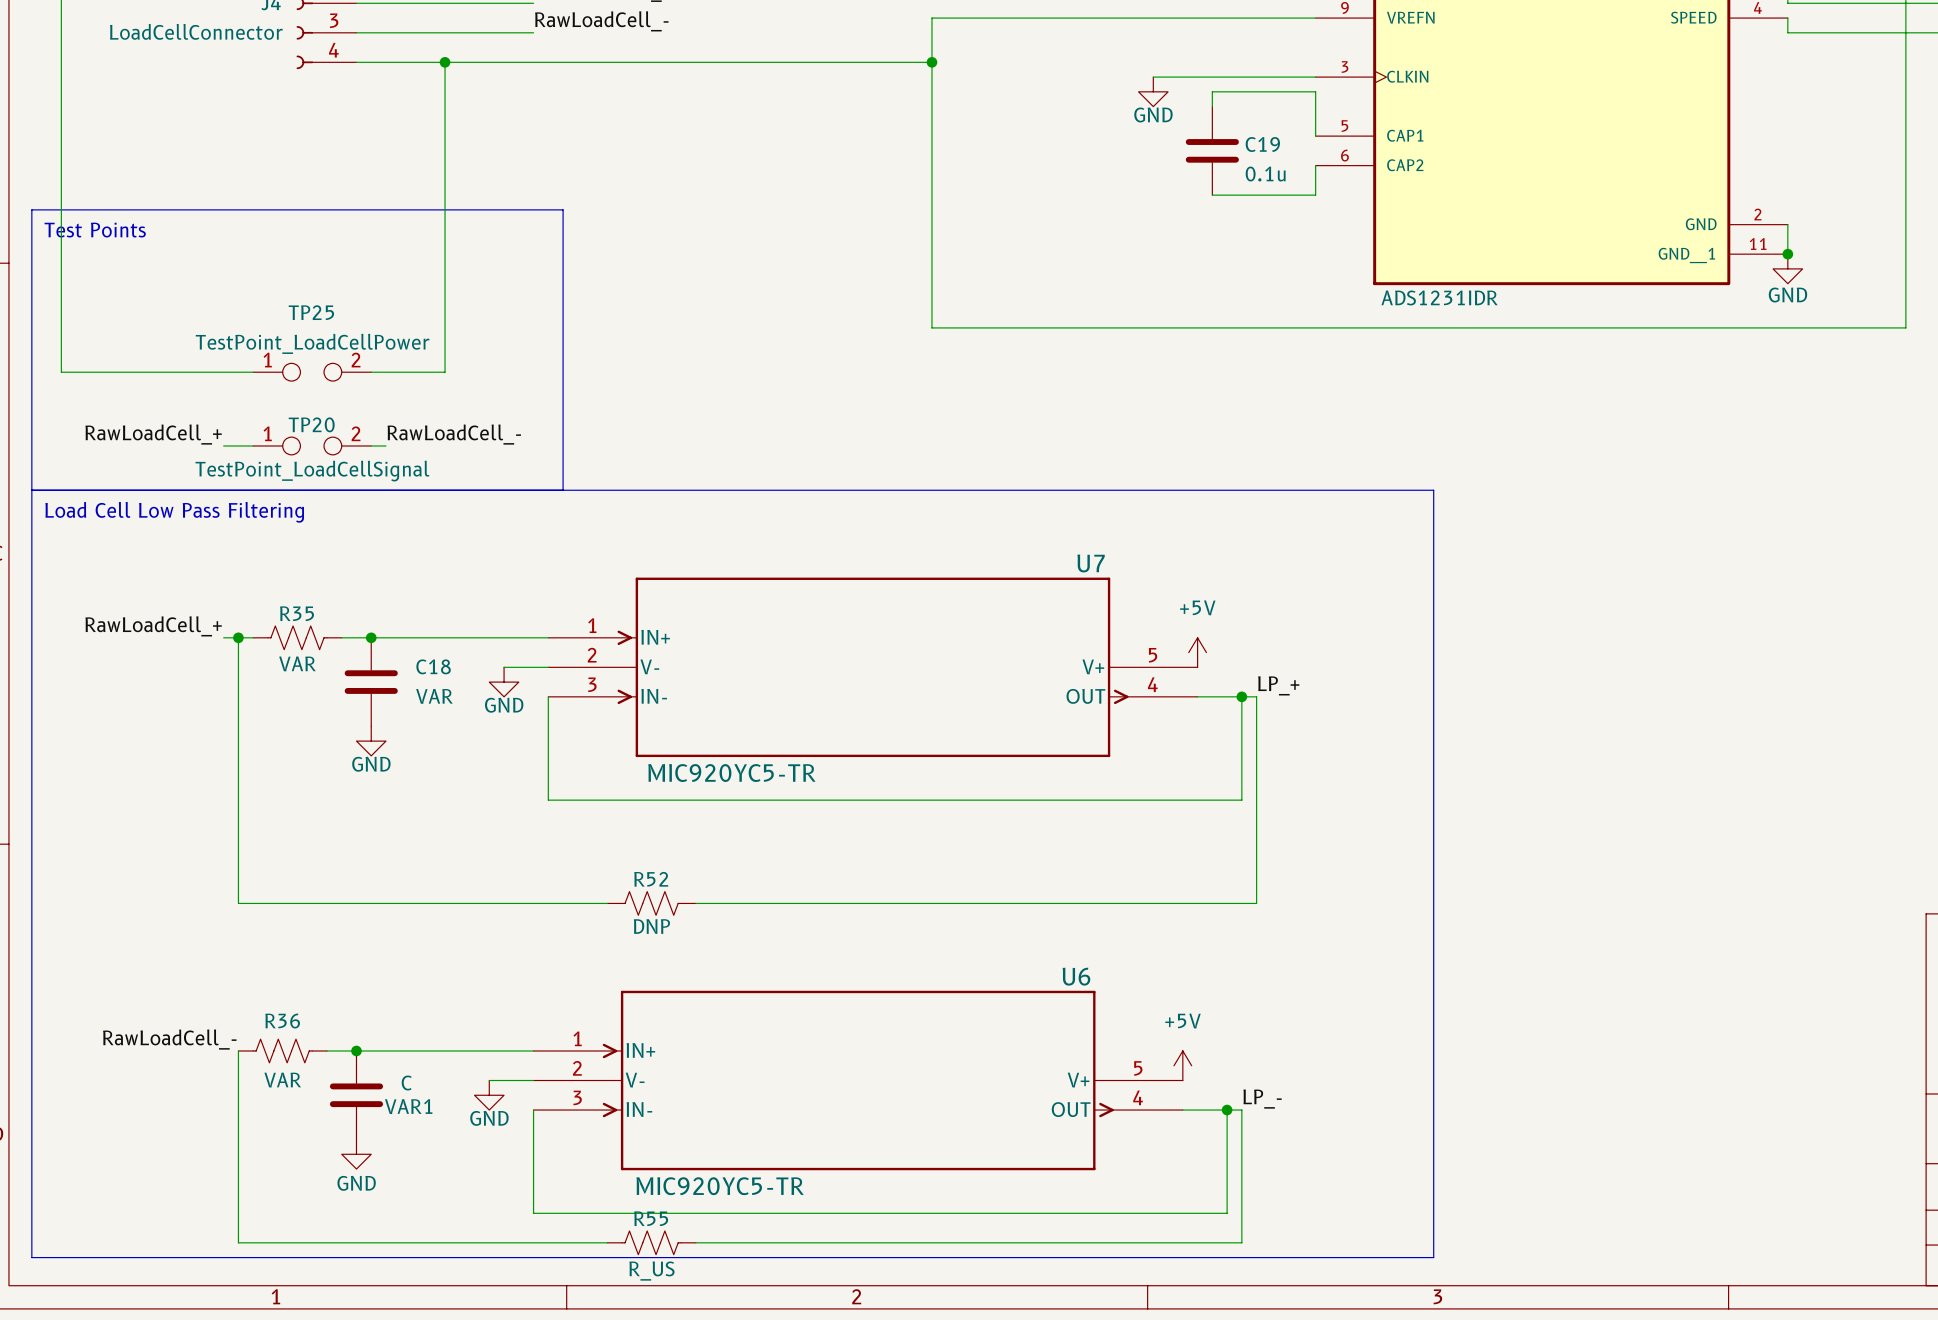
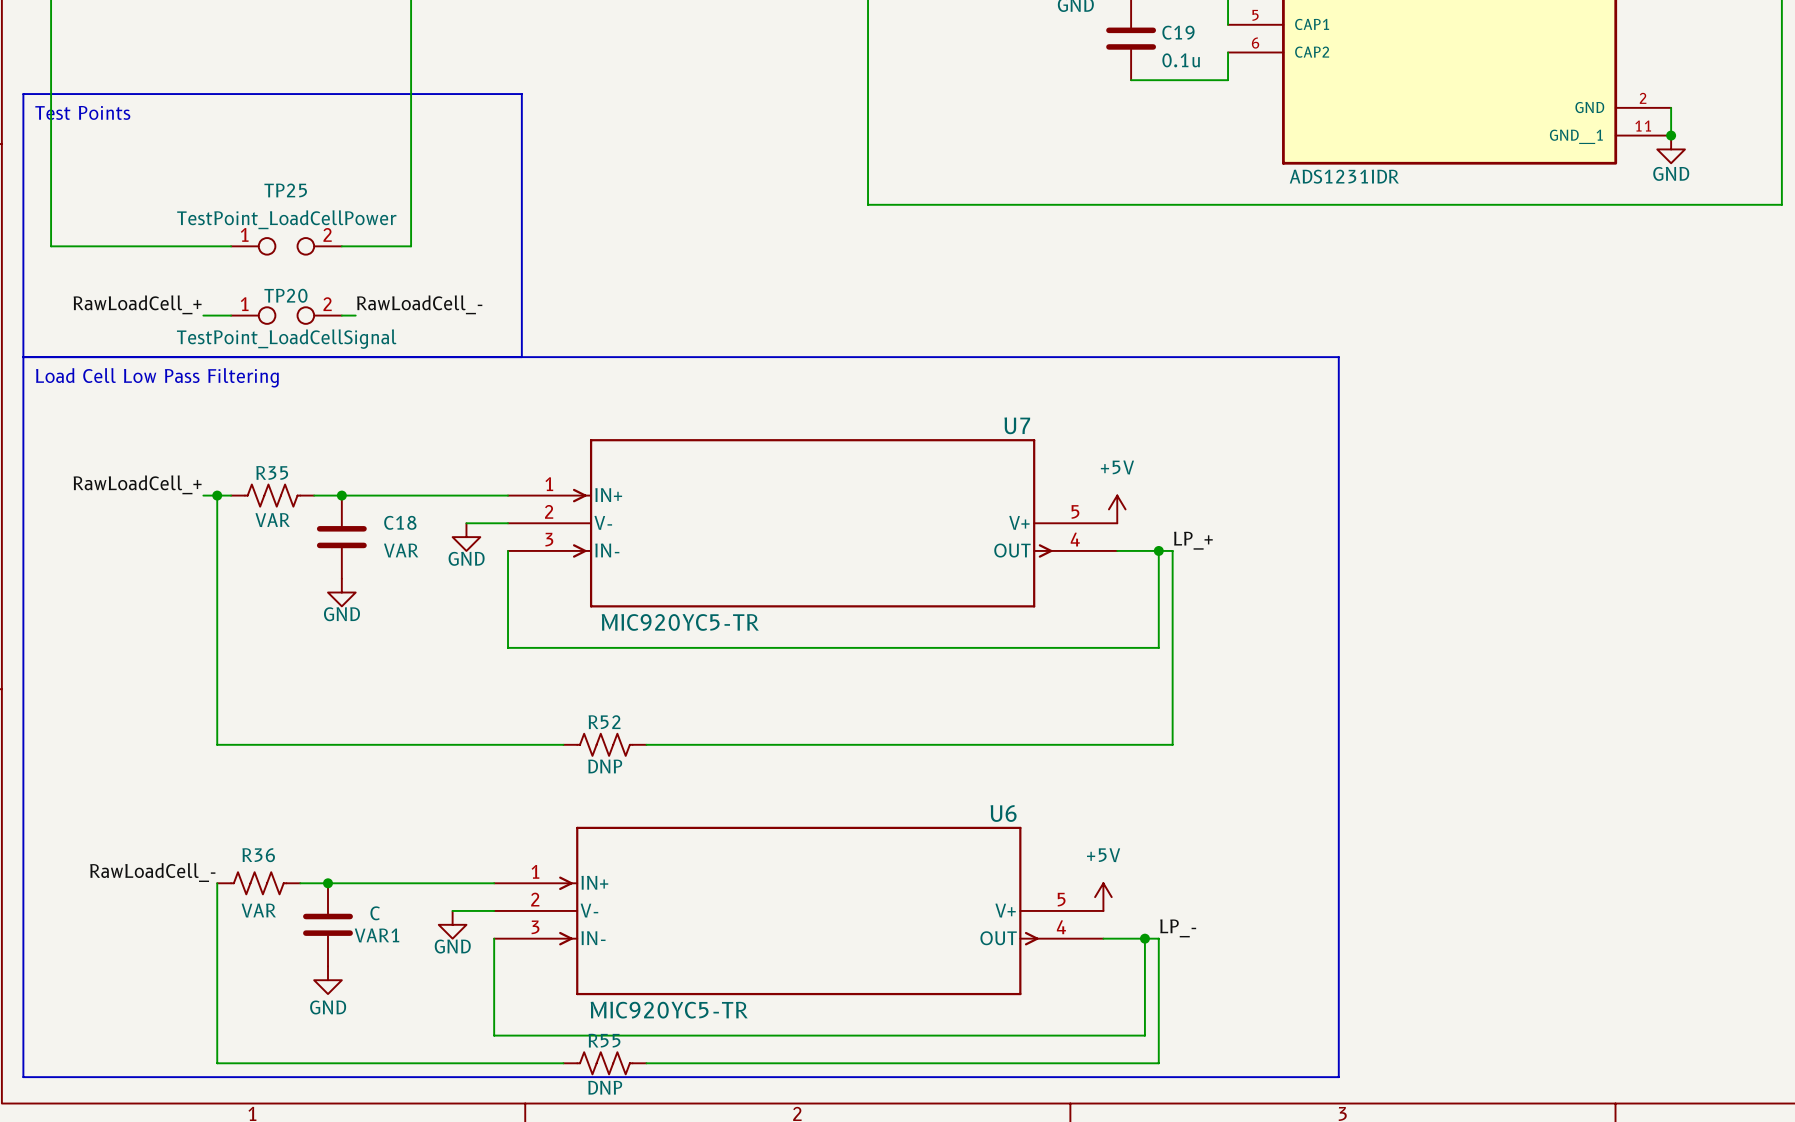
R55 value: R_US (651, 1271) -> DNP (605, 1087)

